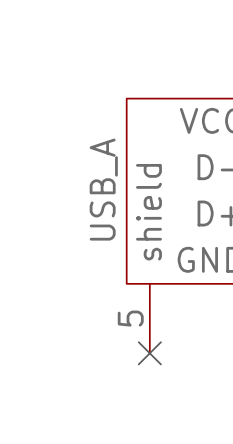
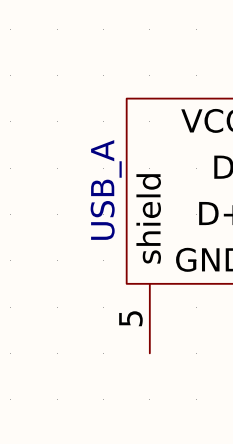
no-connect mark: (149, 353) -> none

